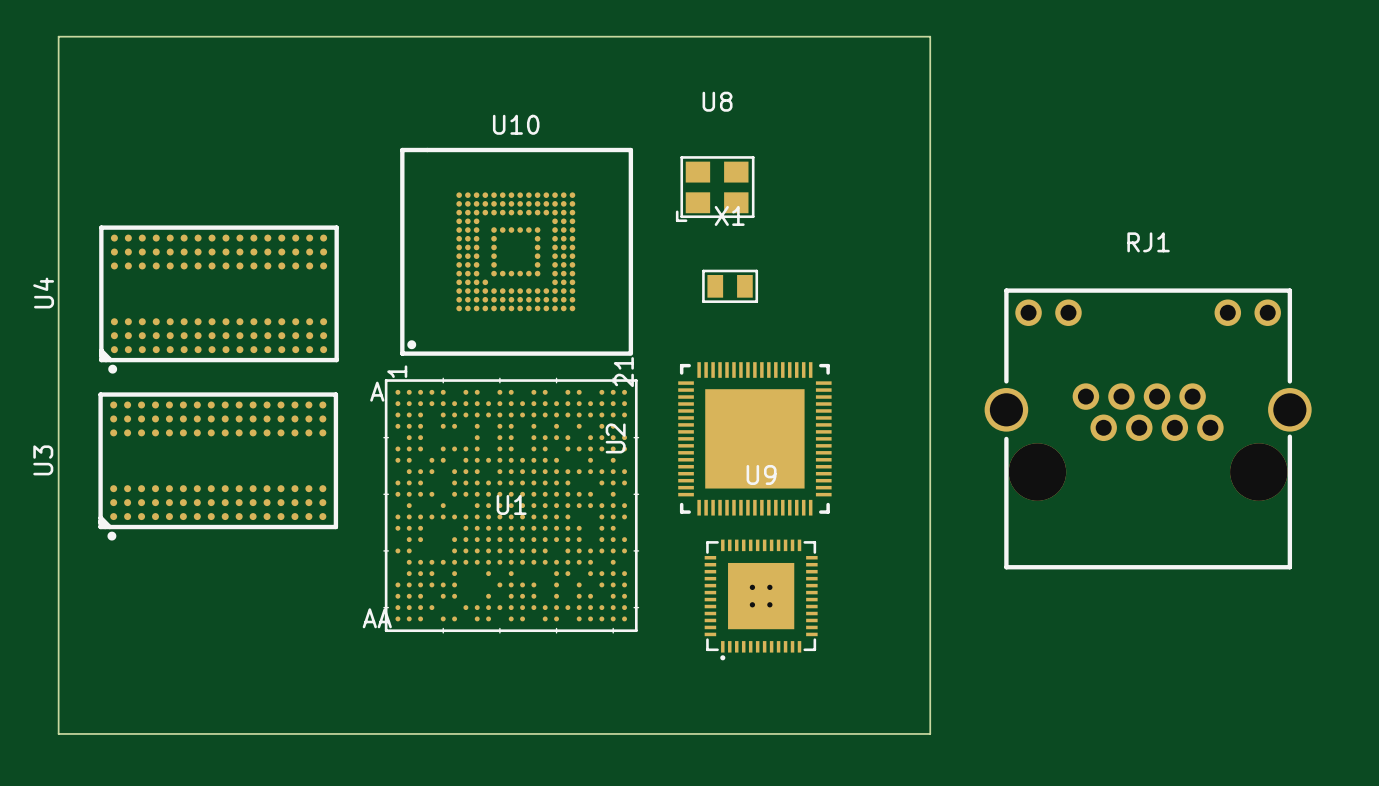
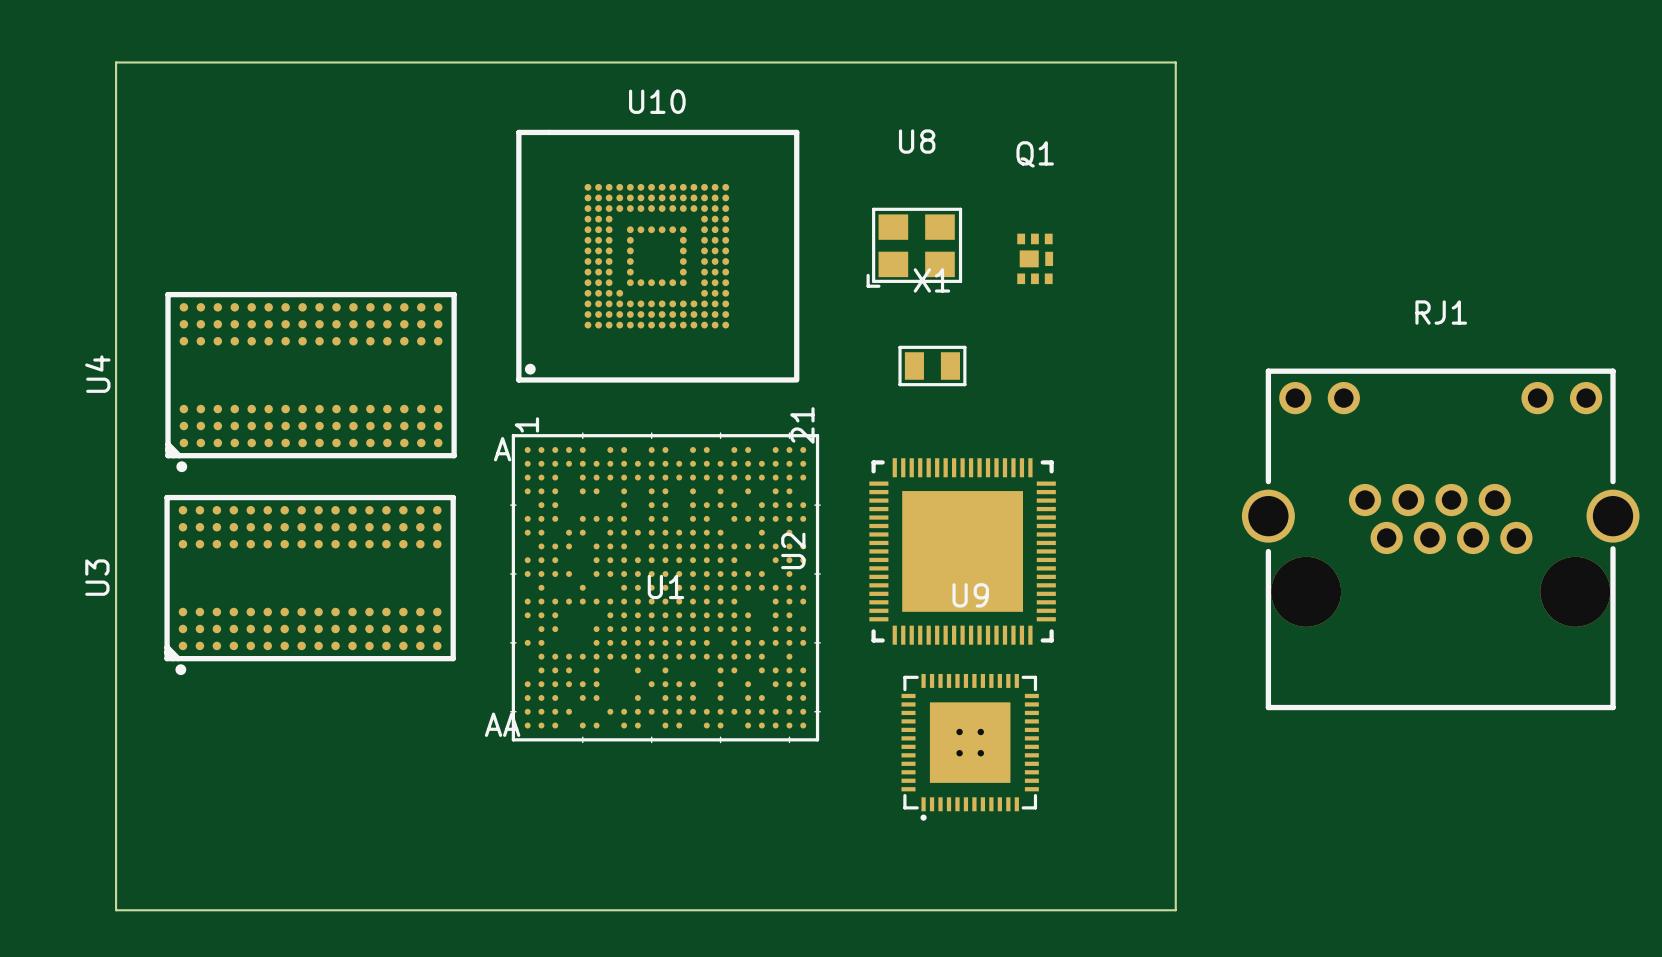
Q1: none -> (1035, 264)
U10 position: (516, 251) -> (657, 256)
U1 position: (511, 505) -> (665, 587)

